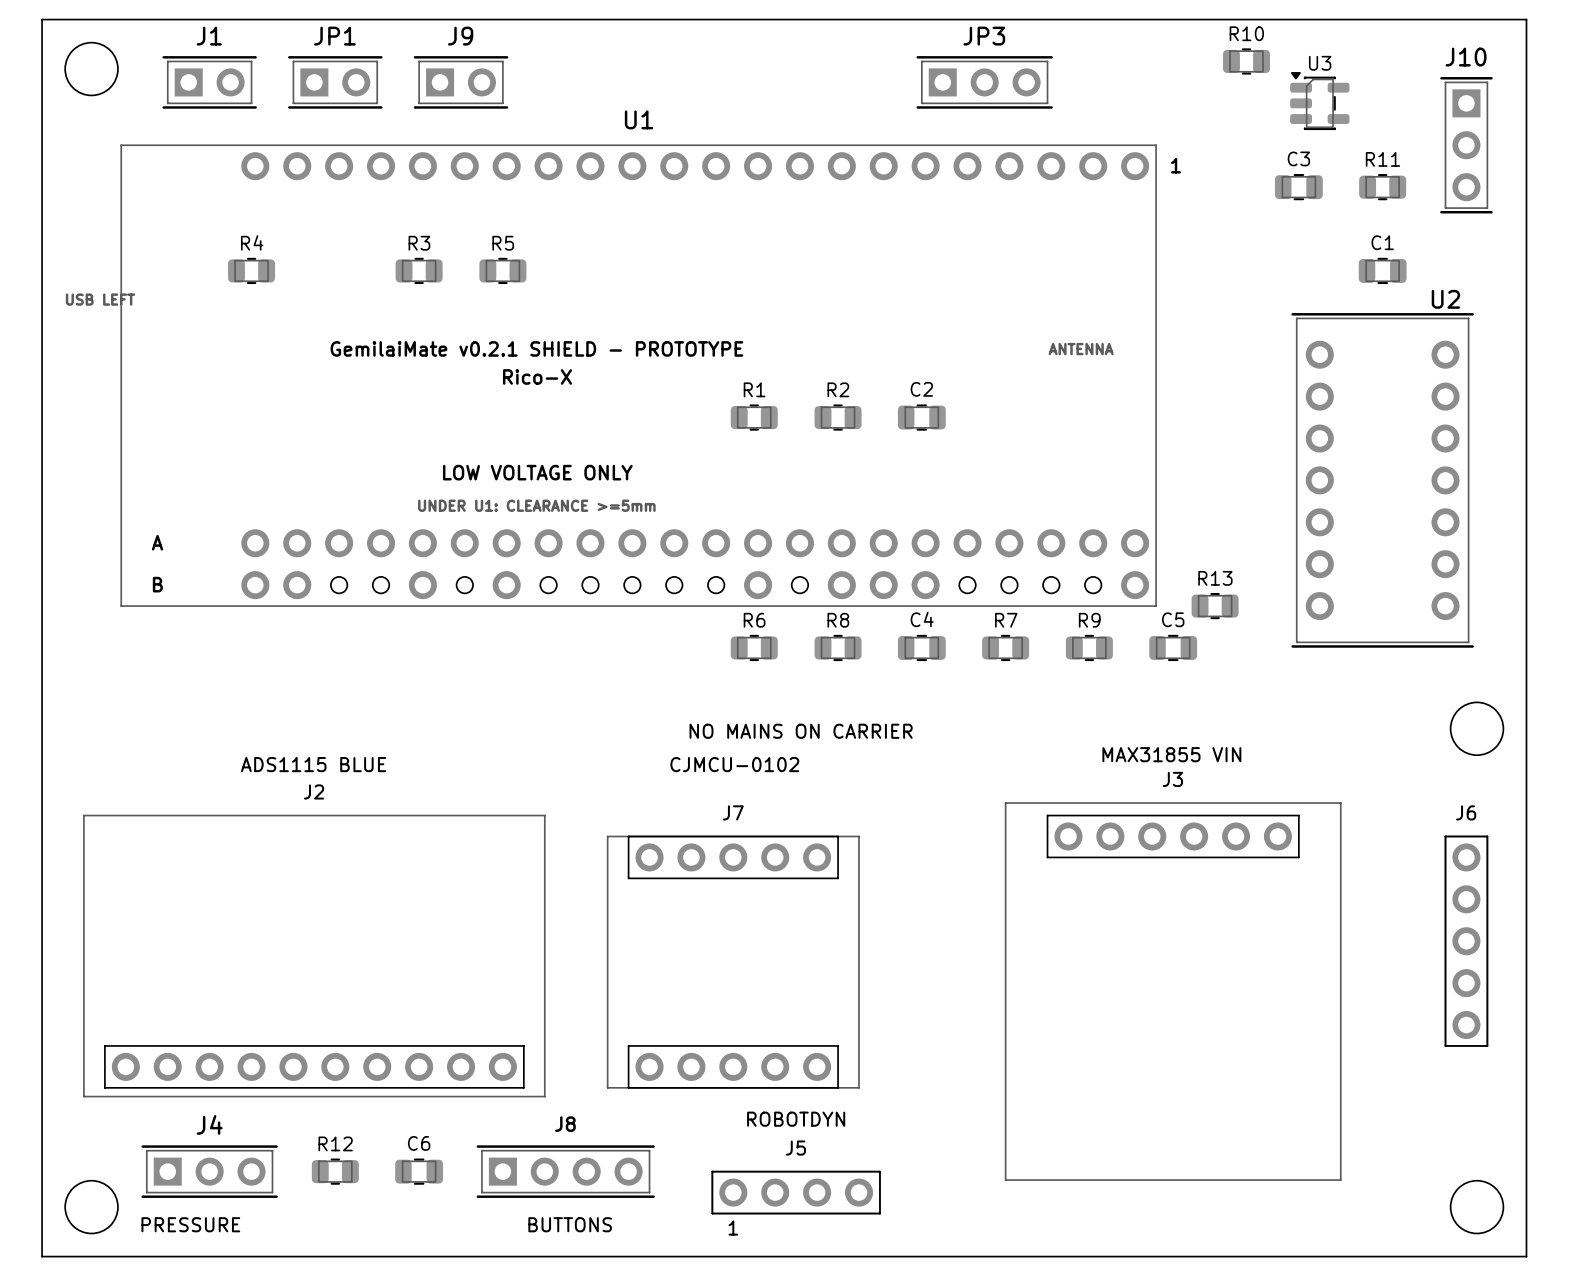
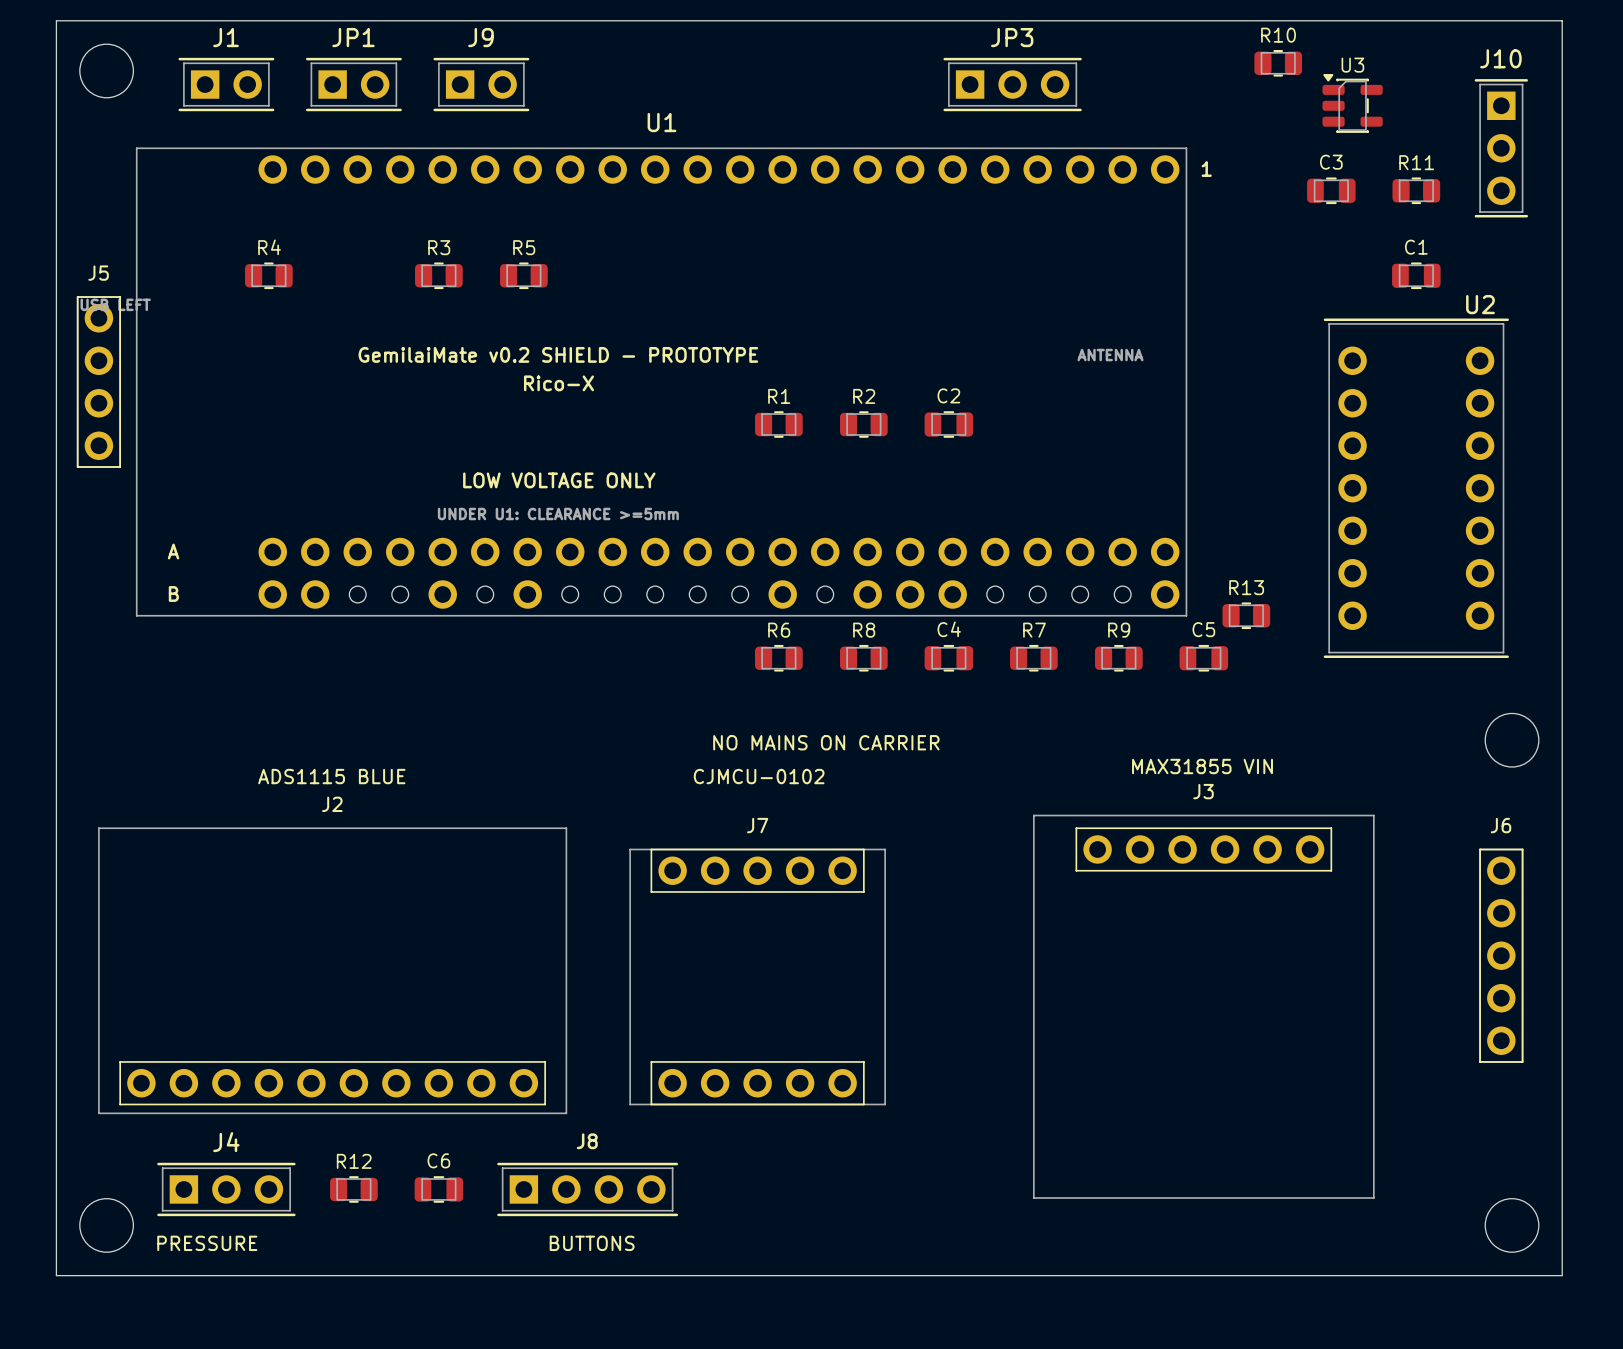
text: GemilaiMate v0.2.1 SHIELD - PROTOTYPE (536, 348) -> GemilaiMate v0.2 SHIELD - PROTOTYPE (558, 354)
text: ROBOTDYN (796, 1119) -> none
J5 name position: J5 (795, 1148) -> J5 (98, 273)
J5 rotation: 0° (796, 1192) -> 90° clockwise (98, 382)
J5 position: (796, 1192) -> (98, 382)
text: 1 (733, 1228) -> none

